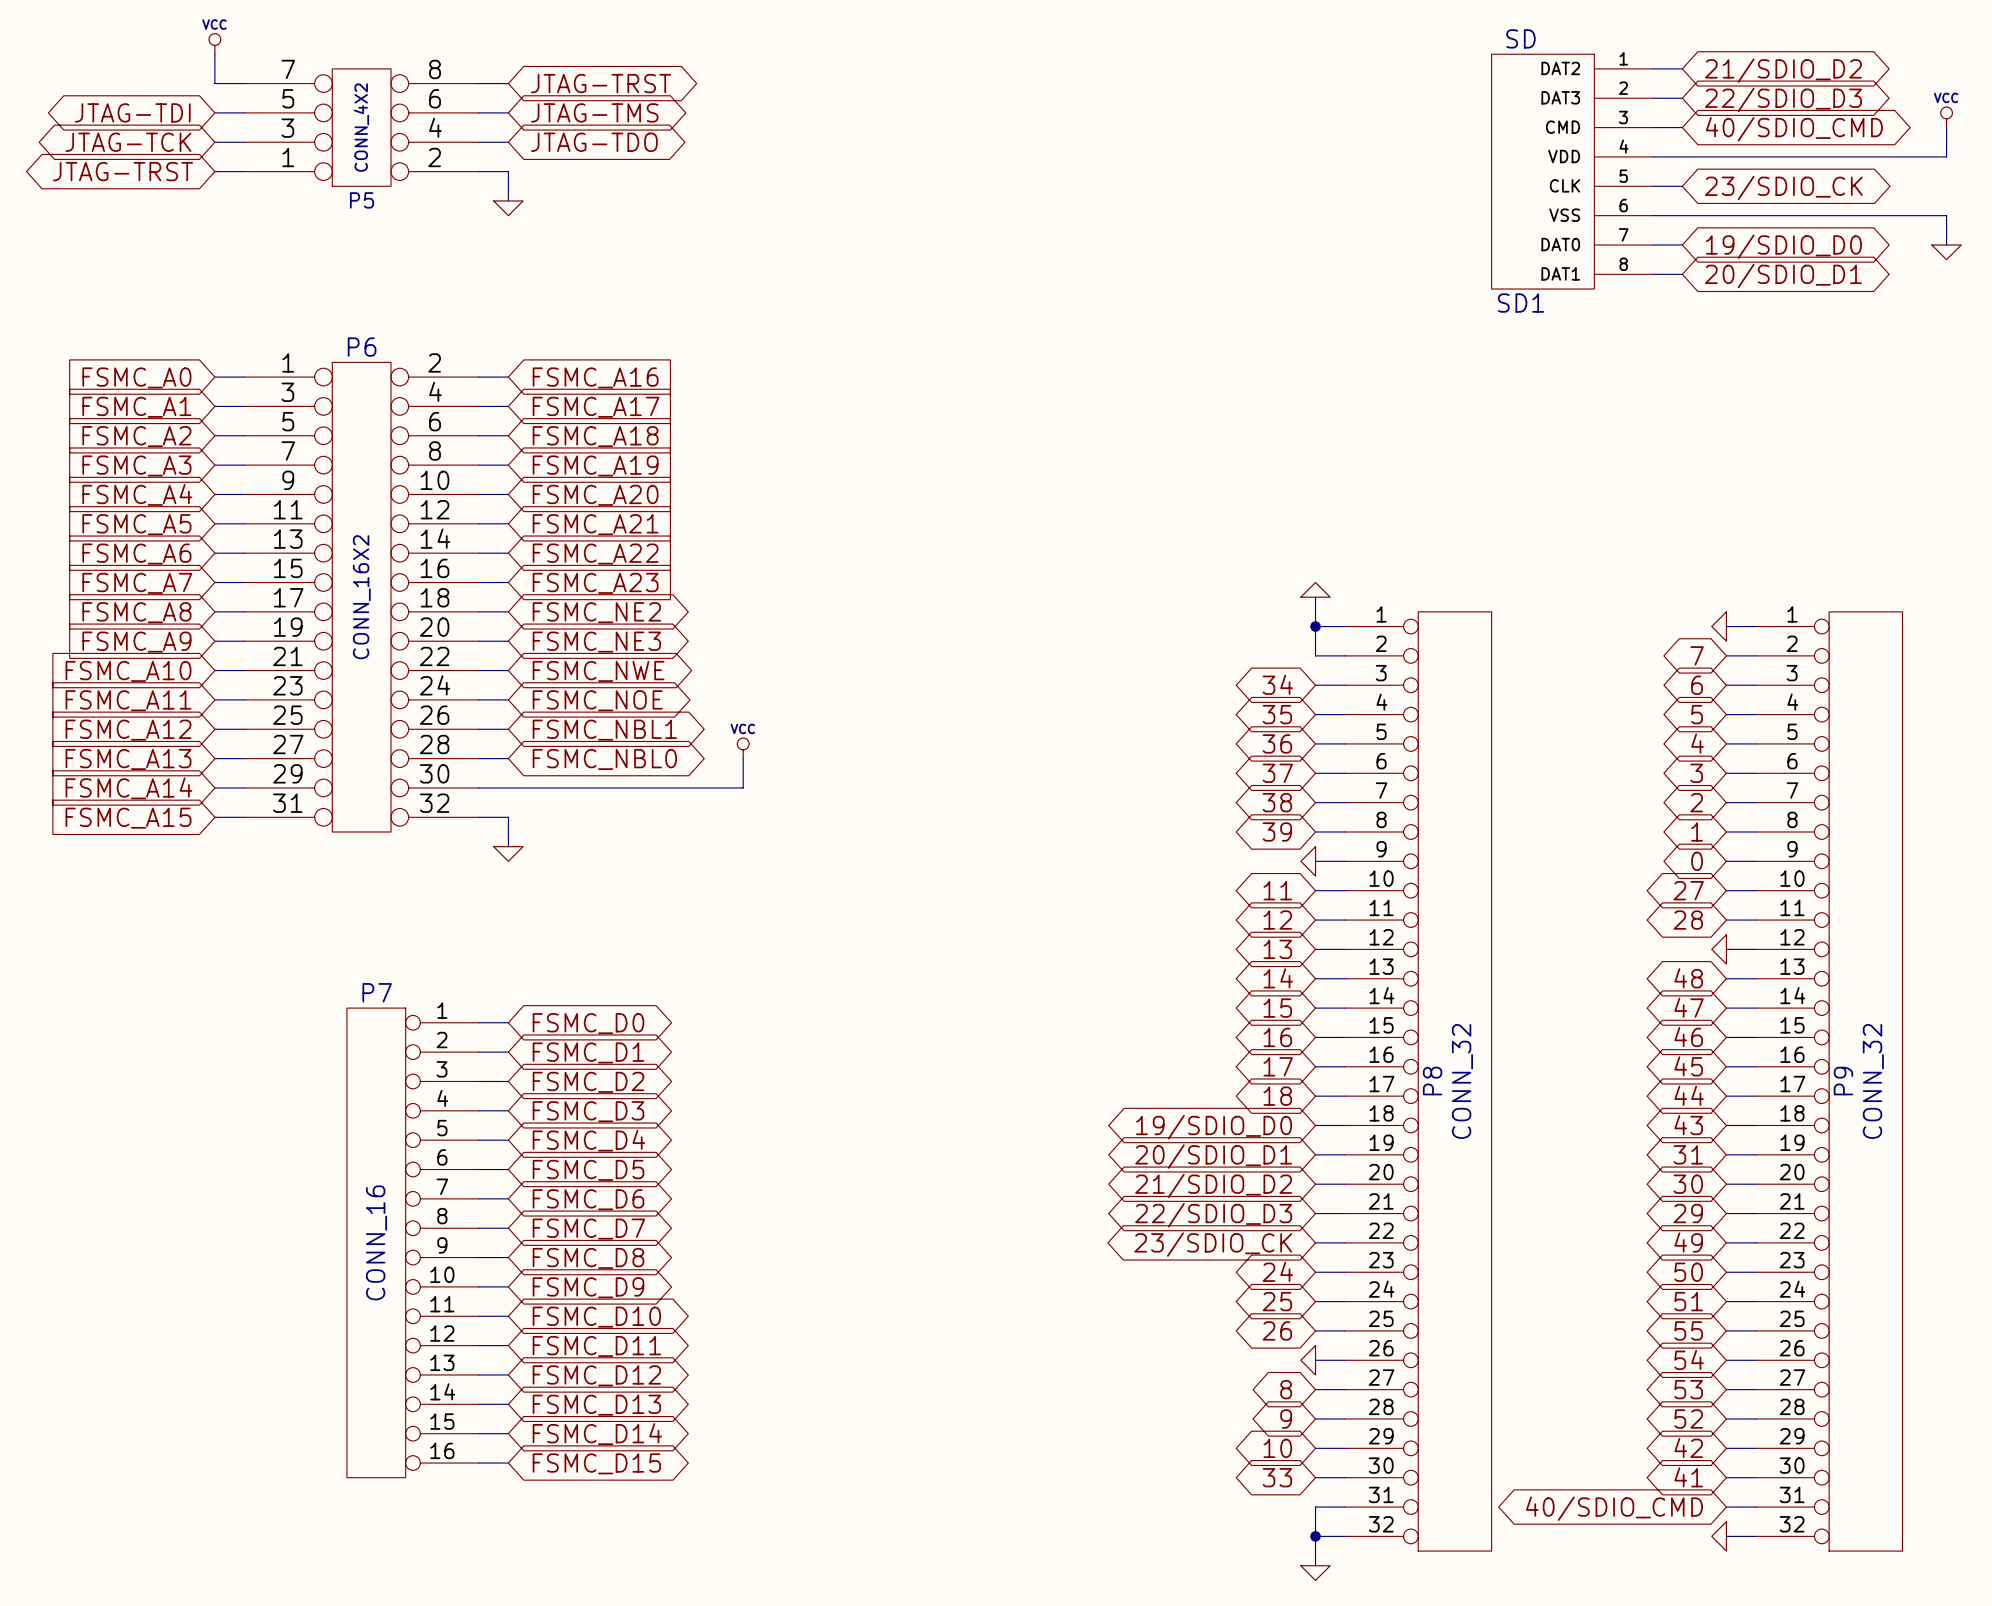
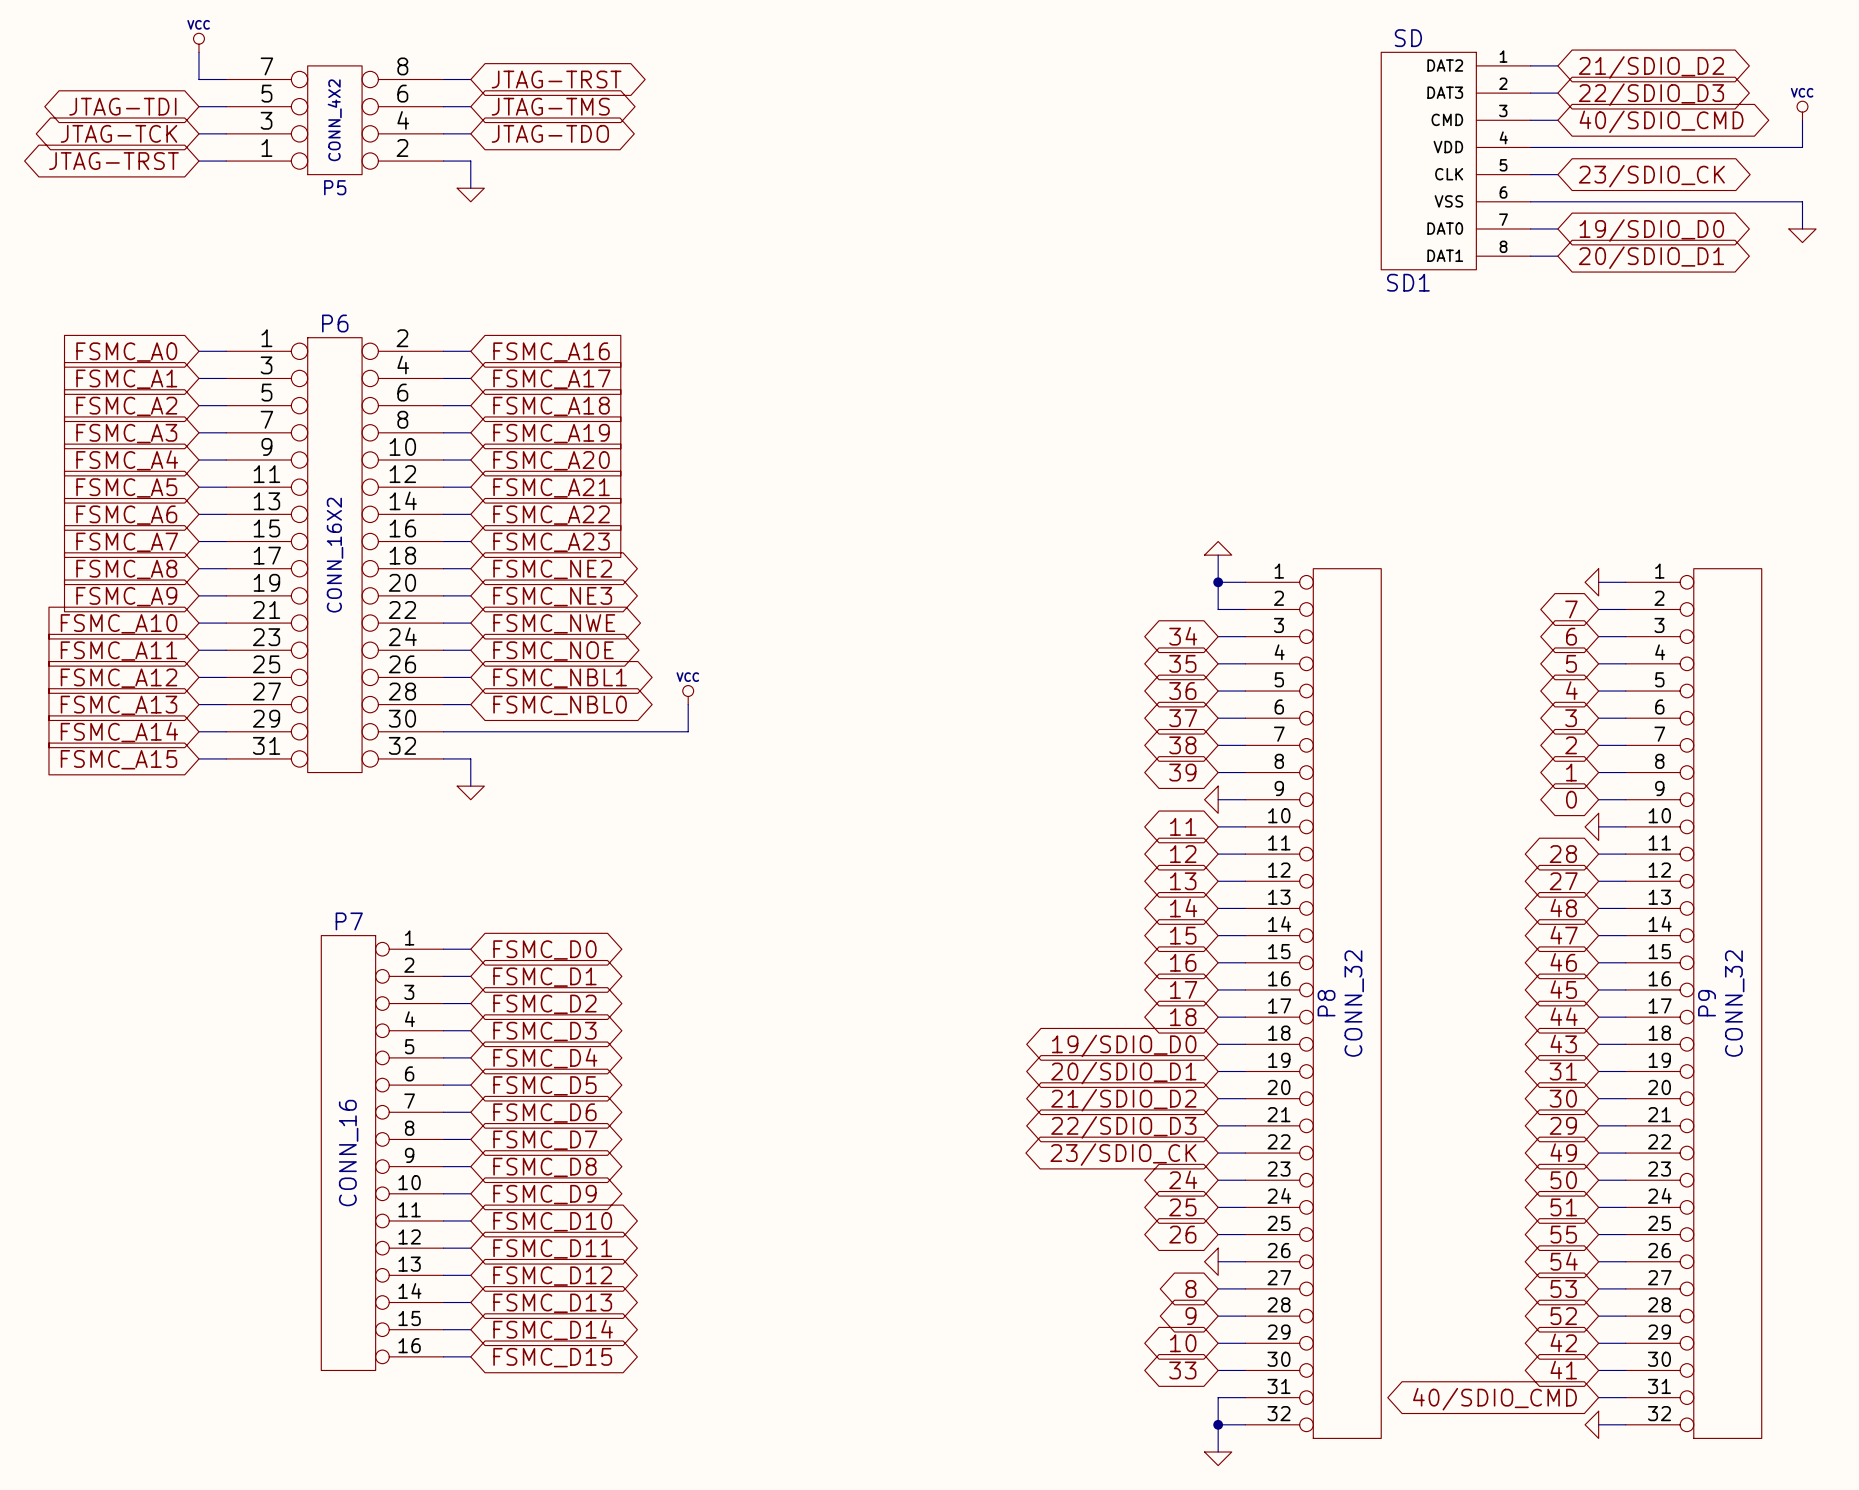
global label position: 27 (1688, 890) -> 27 (1563, 881)
power symbol position: (1719, 949) -> (1591, 826)

